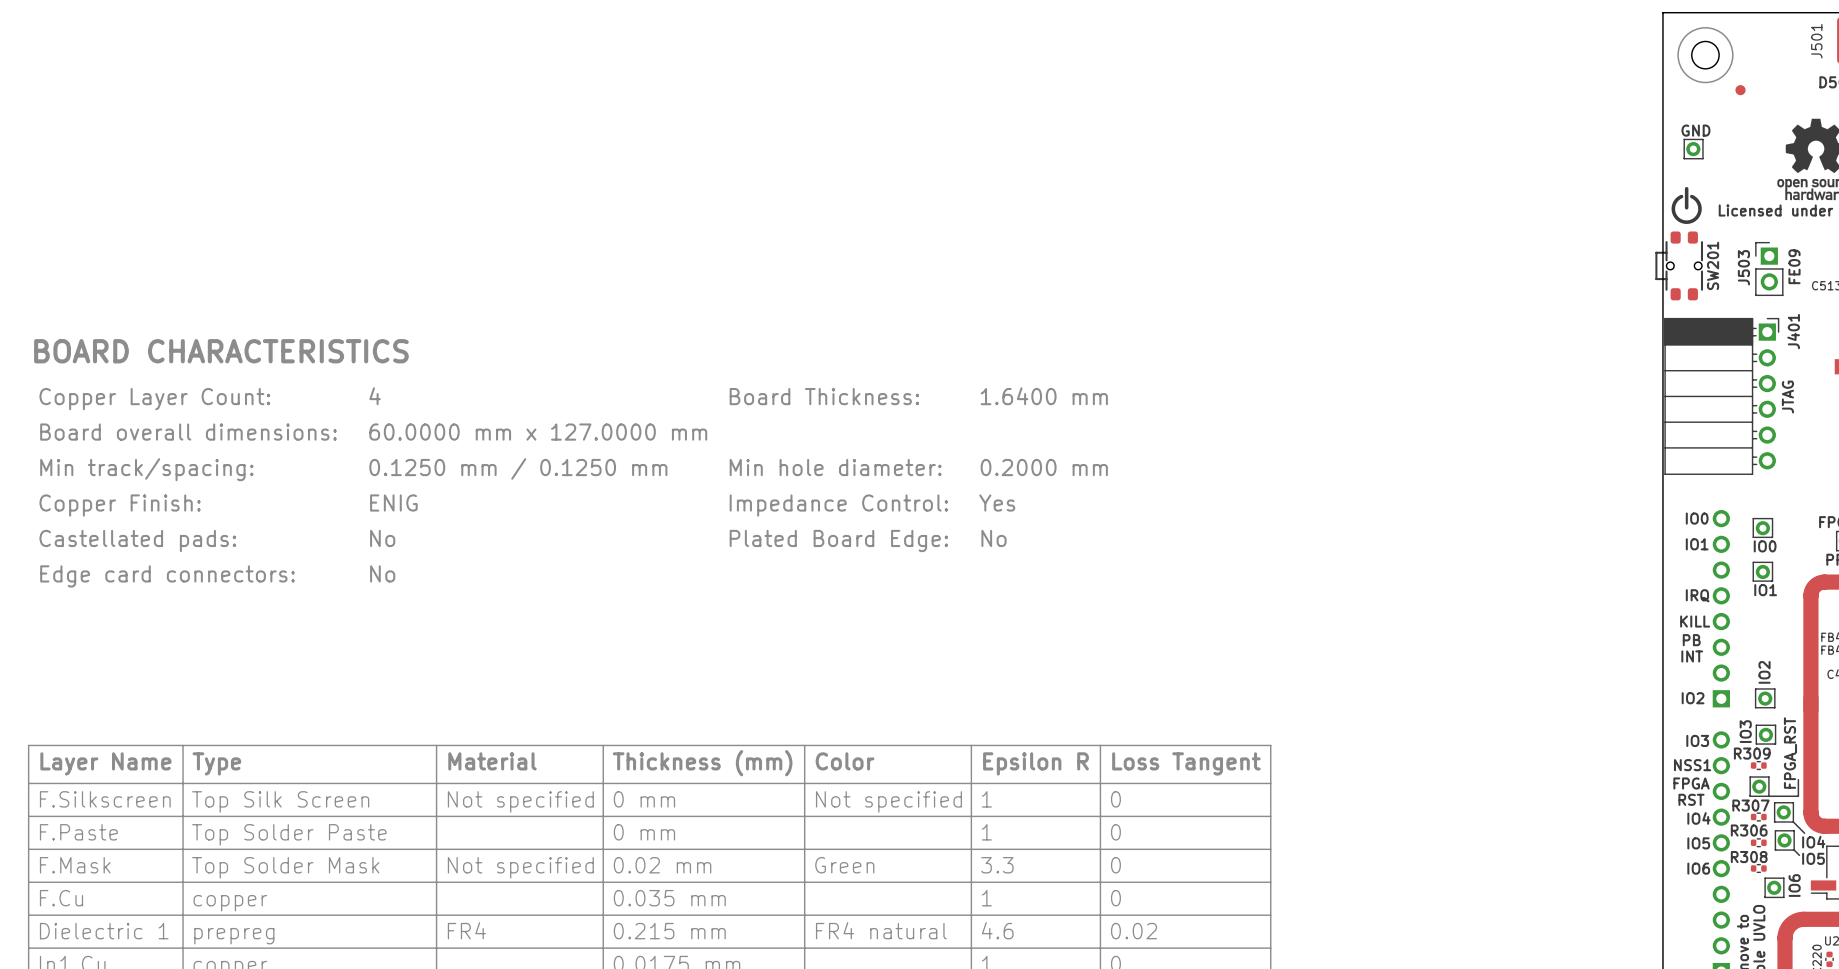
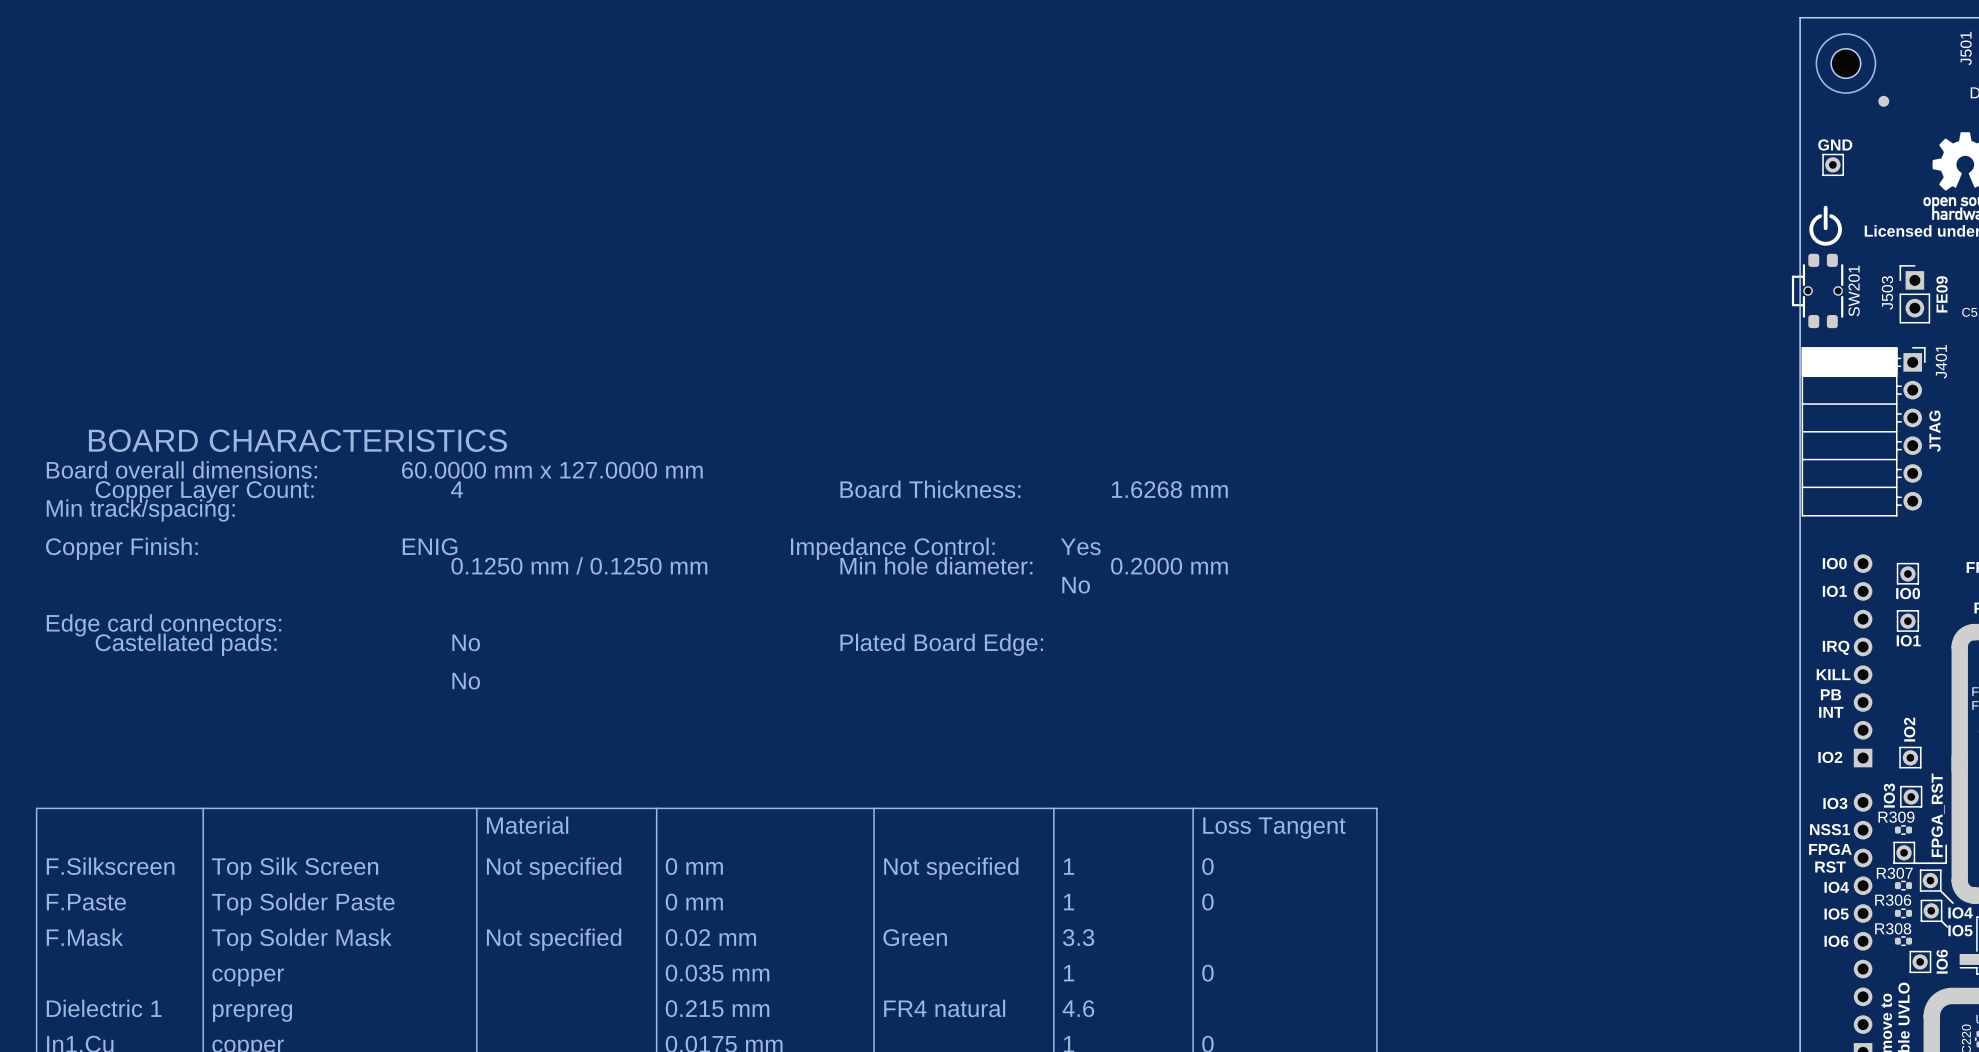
text position: BOARD CHARACTERISTICS (221, 351) -> BOARD CHARACTERISTICS (297, 440)
text position: 4 (375, 396) -> 4 (457, 489)
text position: Board Thickness: (824, 396) -> Board Thickness: (930, 489)
text: 1.6400 mm (1044, 396) -> none
text position: Copper Layer Count: (154, 399) -> Copper Layer Count: (204, 492)
text: none -> 1.6268 mm (1169, 489)
text position: Min hole diameter: (835, 467) -> Min hole diameter: (936, 565)
text position: 0.2000 mm (1044, 467) -> 0.2000 mm (1169, 566)
text position: 0.1250 mm / 0.1250 mm (518, 468) -> 0.1250 mm / 0.1250 mm (579, 565)
text: No (382, 538) -> none
text position: Castellated pads: (137, 540) -> Castellated pads: (186, 644)
text position: Plated Board Edge: (838, 540) -> Plated Board Edge: (941, 644)
text: No (382, 573) -> none
text: none -> No (466, 642)
text: none -> No (466, 681)
text: Color (845, 761) -> none
text: Layer Name (105, 763) -> none
text: Type (216, 763) -> none
text: Thickness (mm) (702, 763) -> none
text: Epsilon R (1035, 763) -> none
line: (28, 783) (1270, 783) -> none
line: (28, 816) (1270, 816) -> none
line: (28, 849) (1270, 849) -> none
text: 0 (1115, 865) -> none
line: (28, 882) (1270, 882) -> none
text: F.Cu (61, 898) -> none
line: (28, 915) (1270, 915) -> none
text: FR4 (466, 930) -> none
text: 0.02 (1134, 931) -> none
line: (28, 948) (1270, 948) -> none

